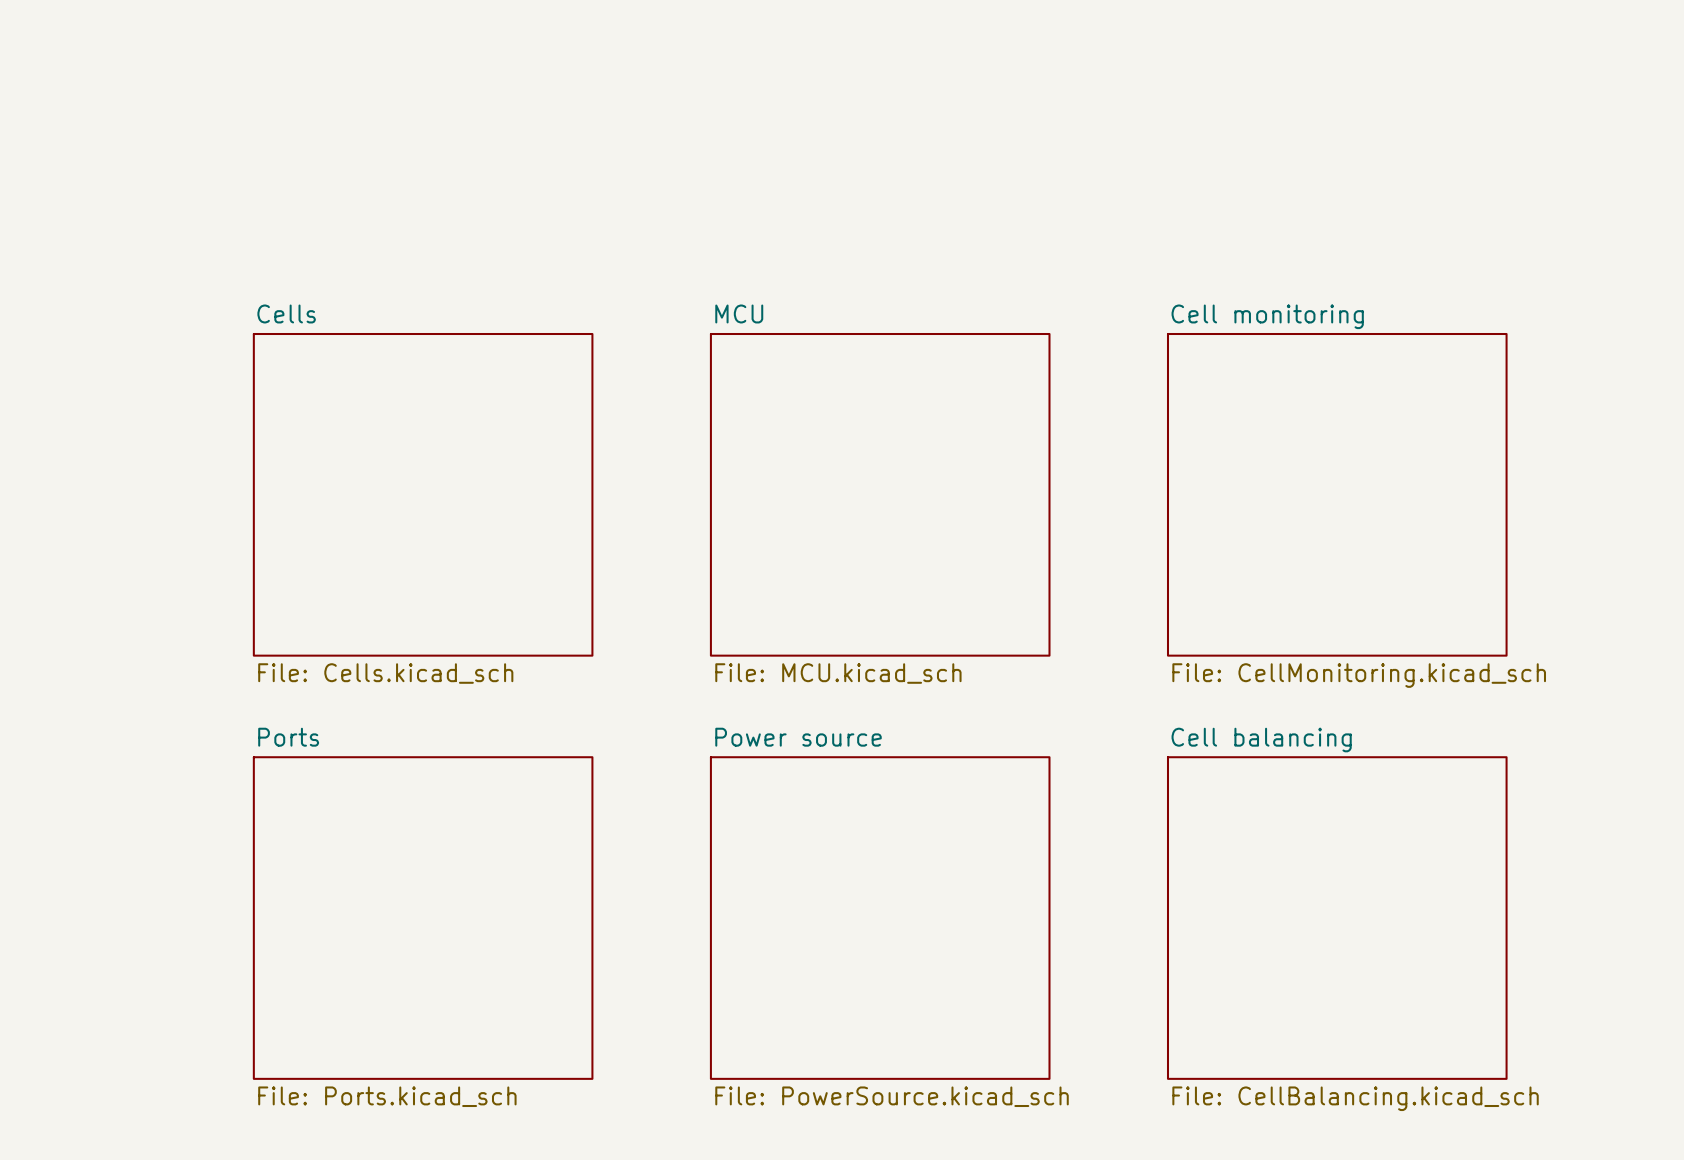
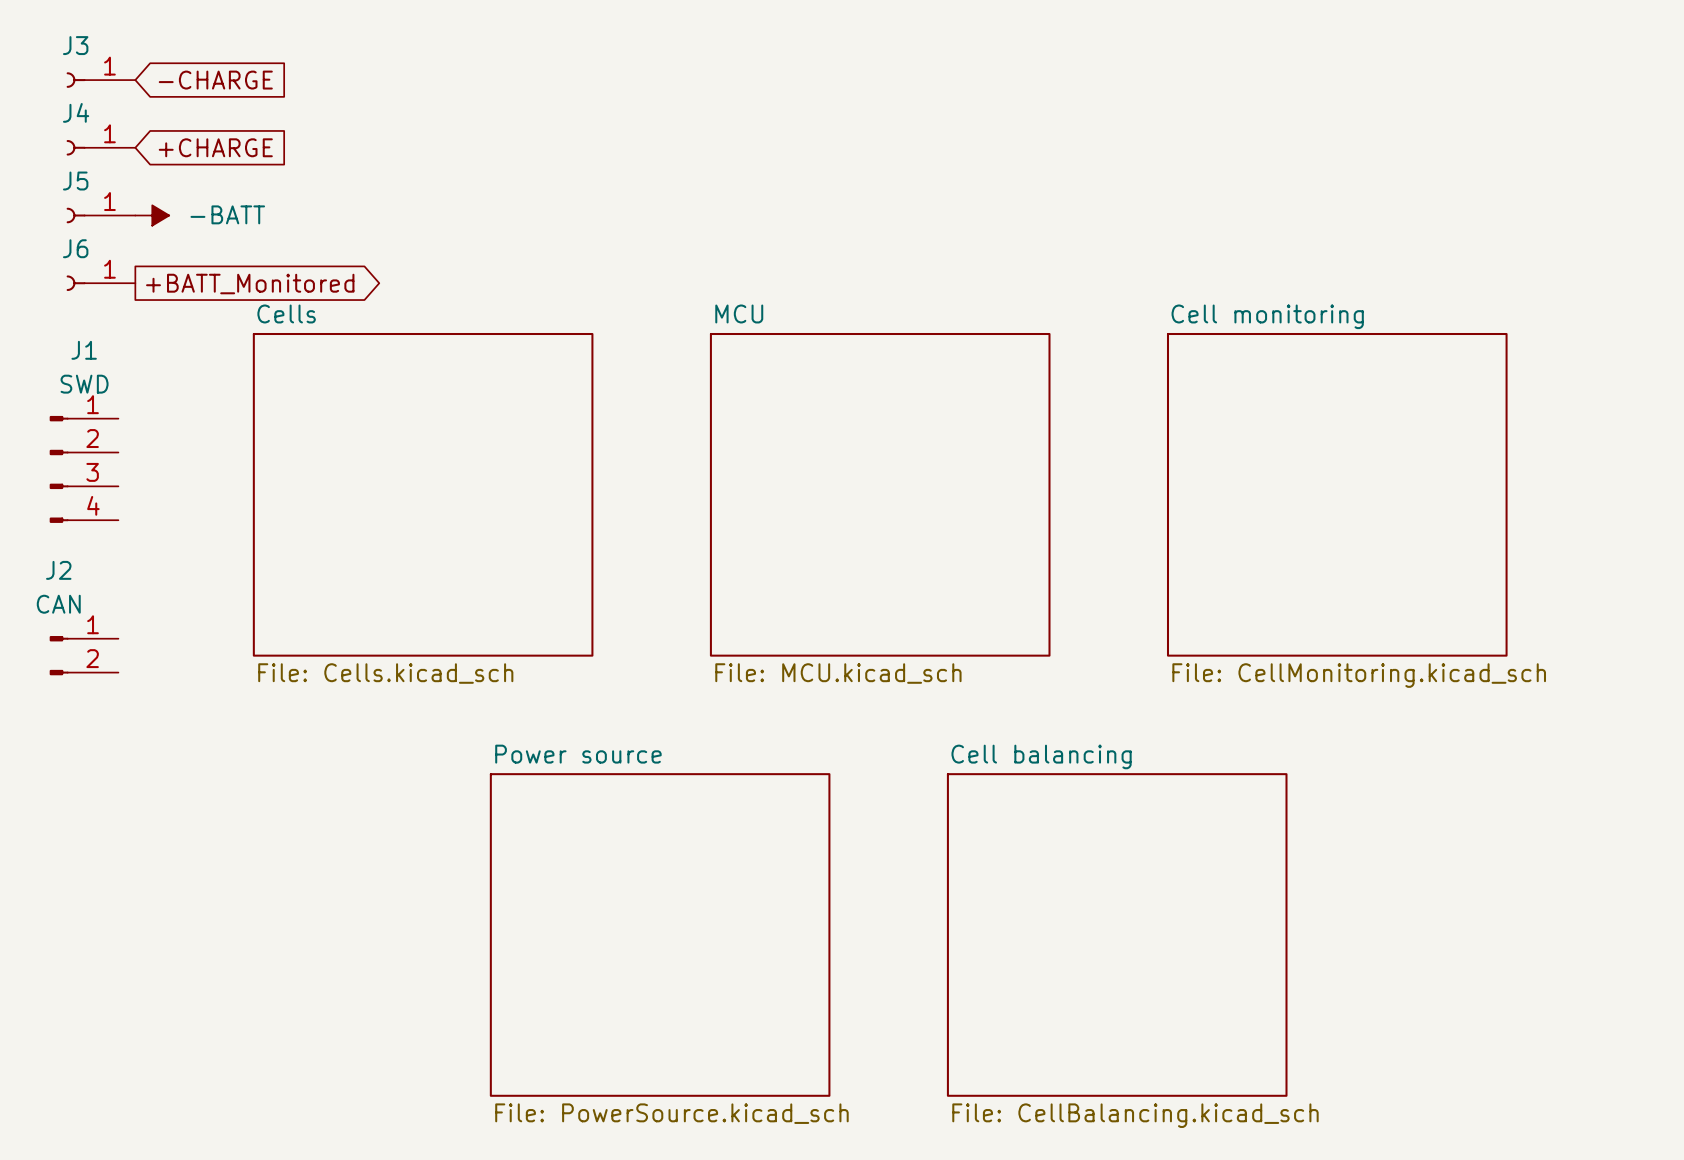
J3: none -> (100, 80)
global label: none -> -CHARGE (215, 80)
J4: none -> (100, 147)
global label: none -> +CHARGE (215, 147)
J5: none -> (100, 215)
power symbol: none -> -BATT (152, 215)
J6: none -> (100, 283)
global label: none -> +BATT_Monitored (250, 284)
J1: none -> SWD (84, 469)
J2: none -> CAN (84, 655)
sheet Ports: File: Ports.kicad_sch (423, 918) -> none
sheet Power source position: (880, 918) -> (660, 934)
sheet Cell balancing position: (1337, 918) -> (1117, 934)

